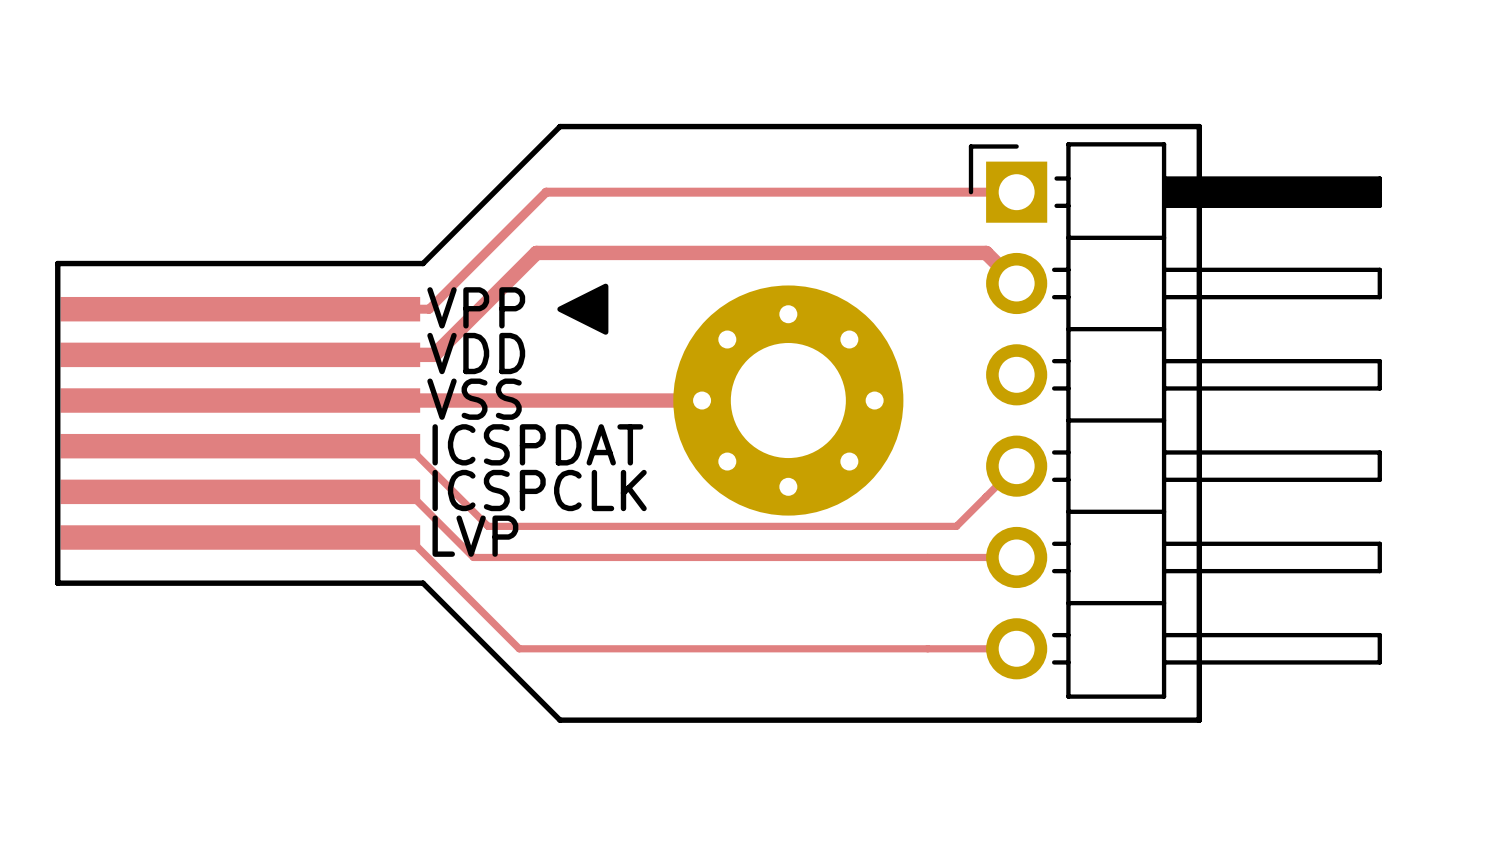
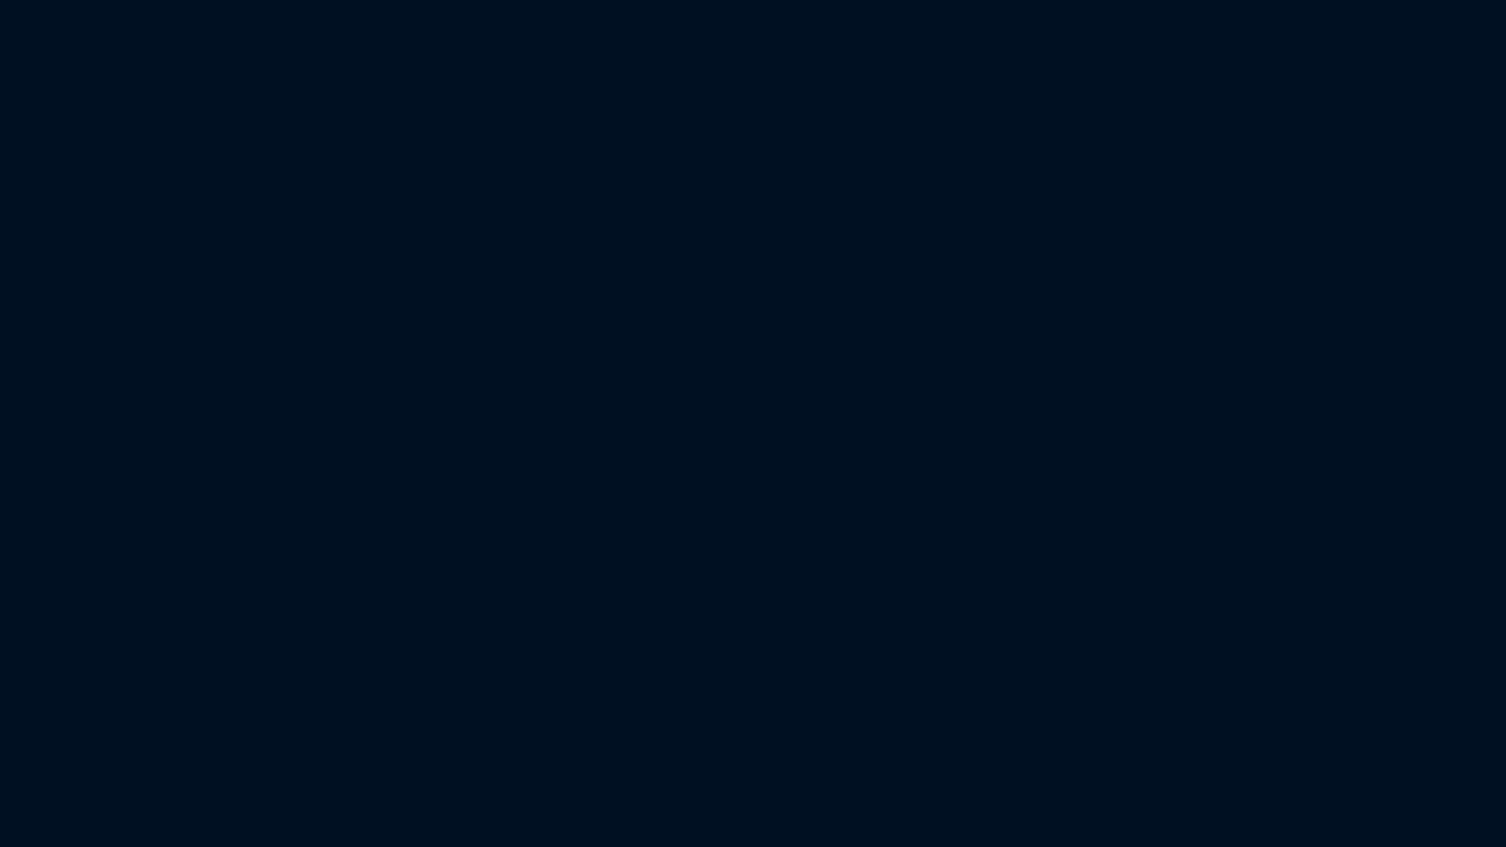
board edge: (560, 126) (423, 263) (57, 263) (57, 583) (423, 583) (560, 720) (1199, 720) (1199, 126) (560, 126) -> none
track: (1016, 192) (546, 192) (429, 309) (240, 309) -> none
drawing: [557, 283, 609, 335] -> none
track: (1016, 283) (986, 252) (536, 252) (434, 354) (240, 354) -> none
text: VPP (476, 307) -> none
text: VDD (476, 353) -> none
text: VSS (474, 399) -> none
track: (240, 400) (788, 400) -> none
part: (788, 400) -> none
part: (1175, 420) -> none
part: (240, 423) -> none
text: ICSPDAT (537, 444) -> none
track: (240, 446) (407, 446) (488, 526) (956, 526) (1016, 466) -> none
text: ICSPCLK (539, 490) -> none
track: (240, 491) (407, 491) (473, 557) (1016, 557) -> none
text: LVP (475, 536) -> none
track: (240, 537) (407, 537) (519, 648) (1016, 648) -> none

